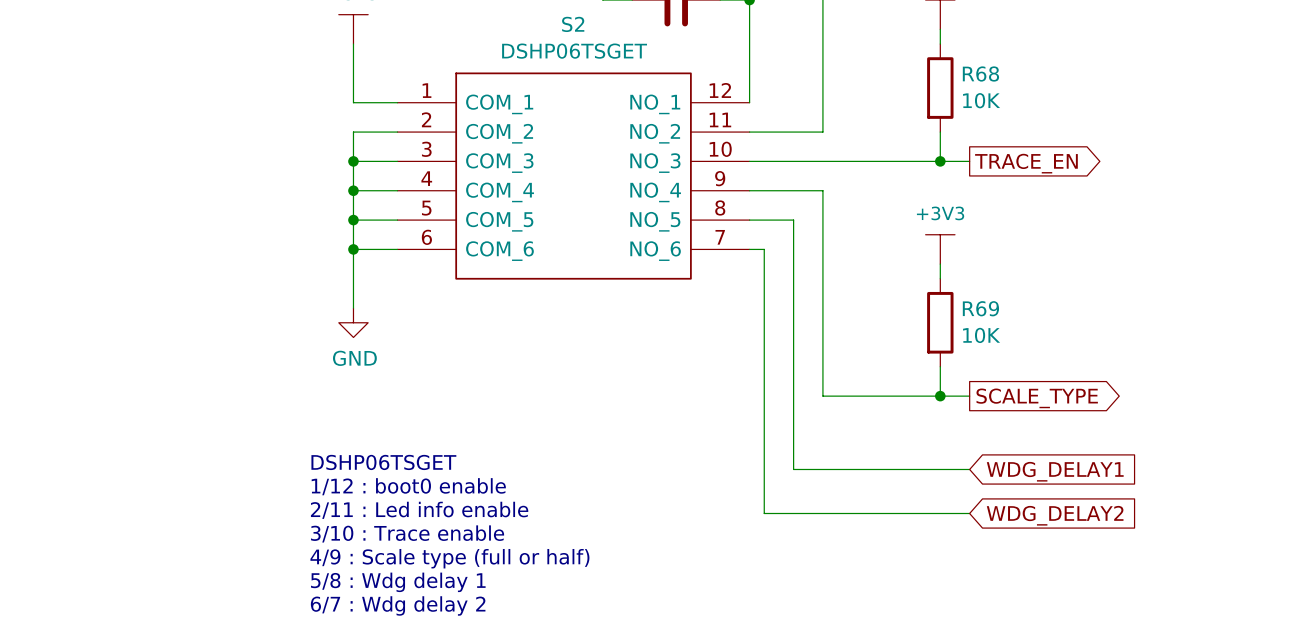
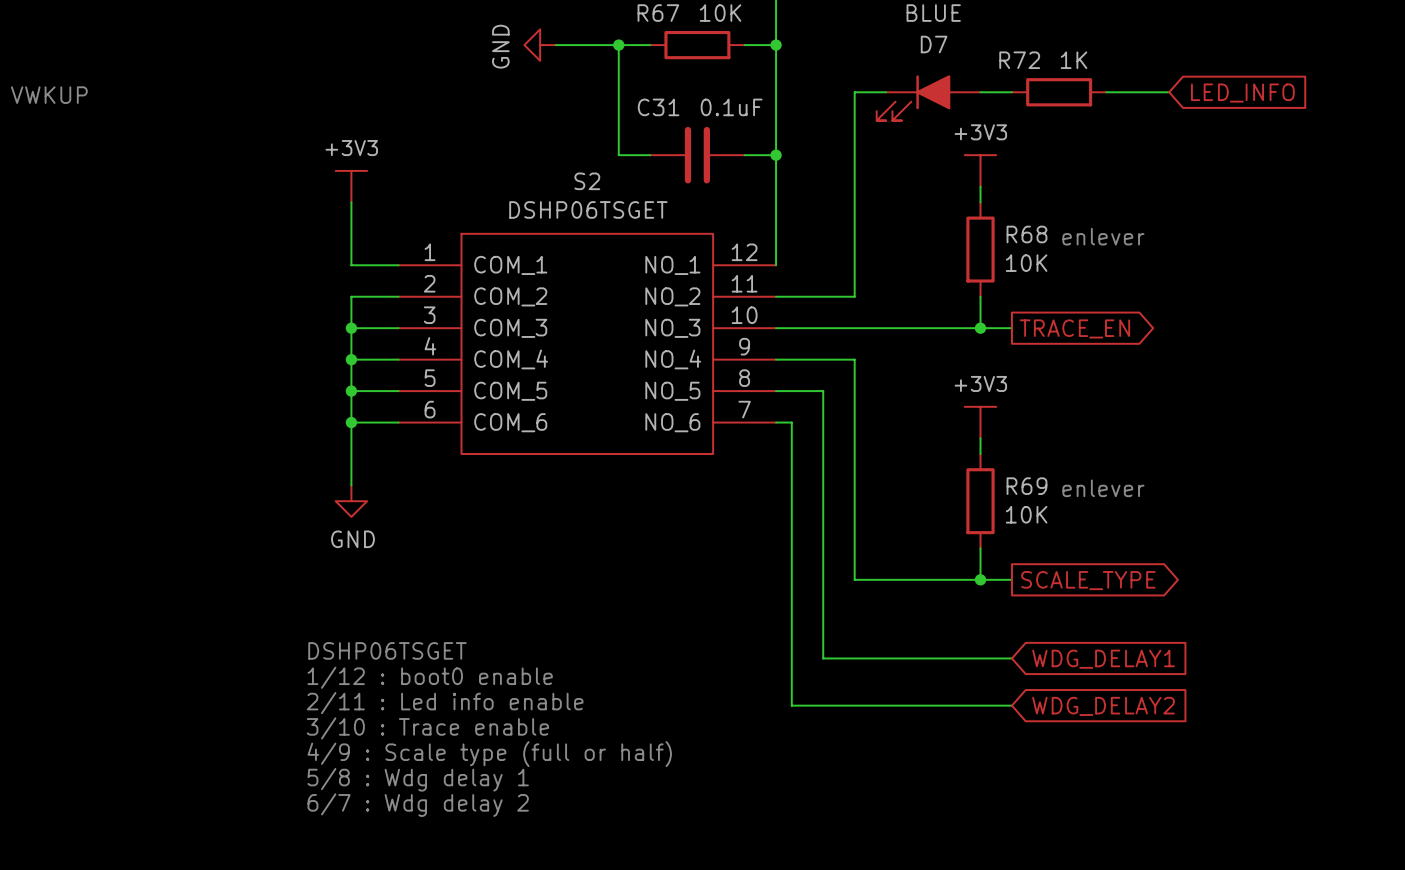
text: none -> enlever (1103, 236)
text: none -> enlever (1103, 488)

